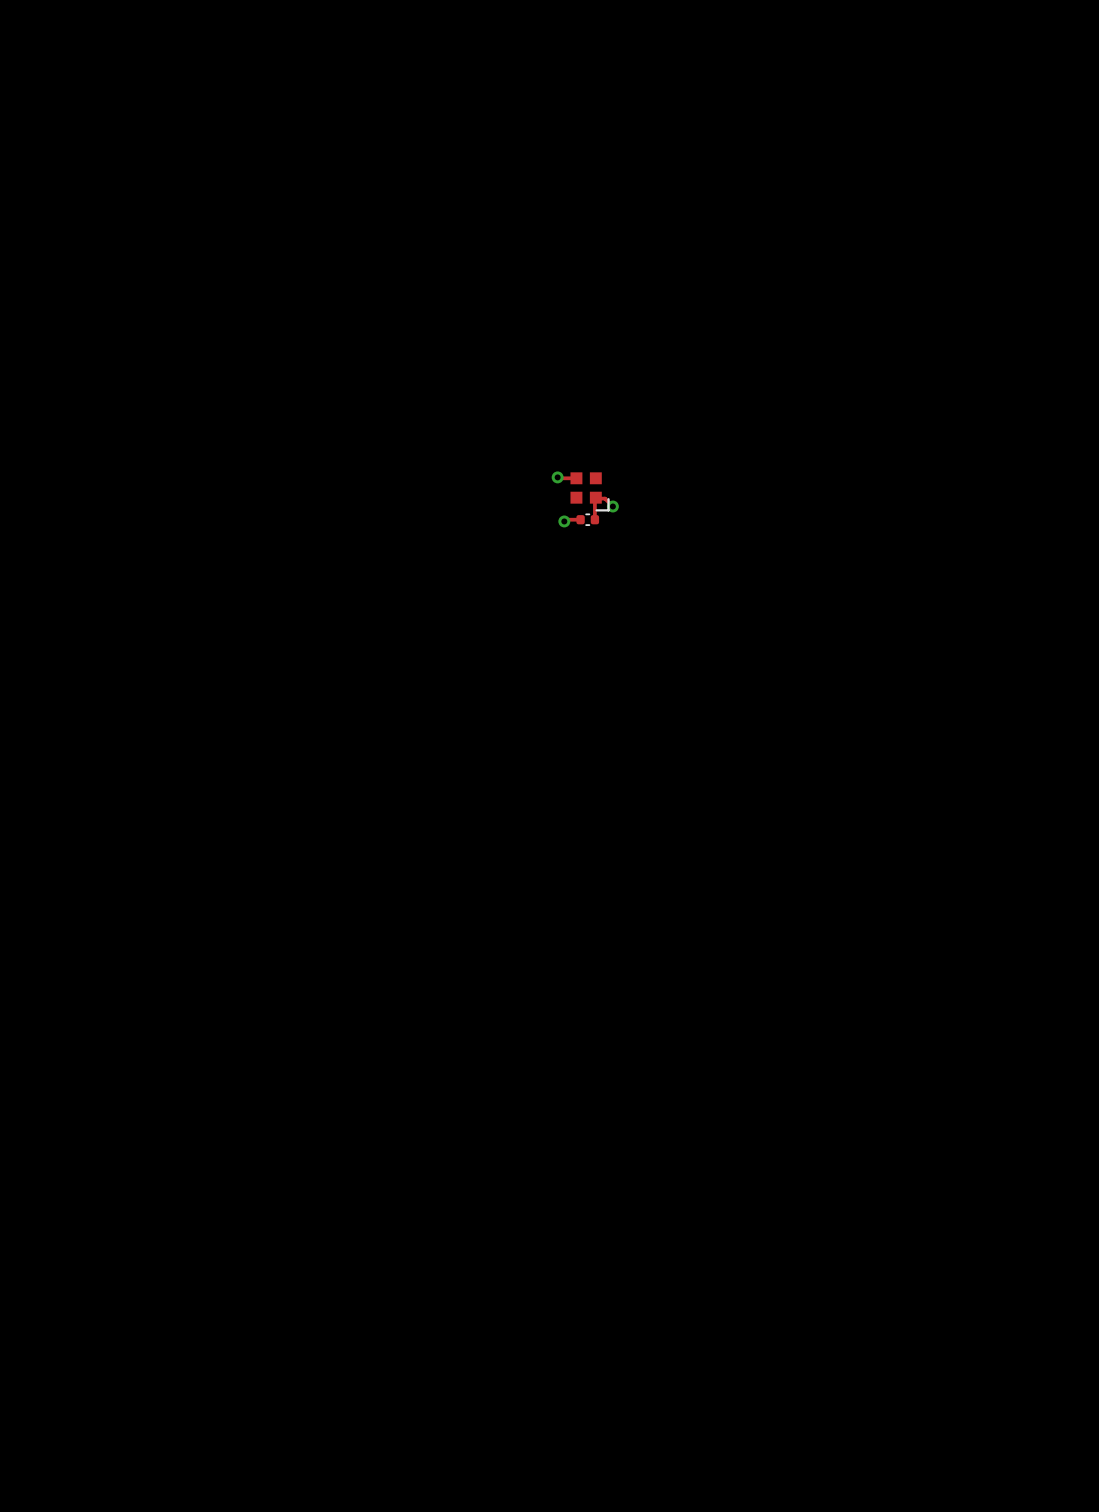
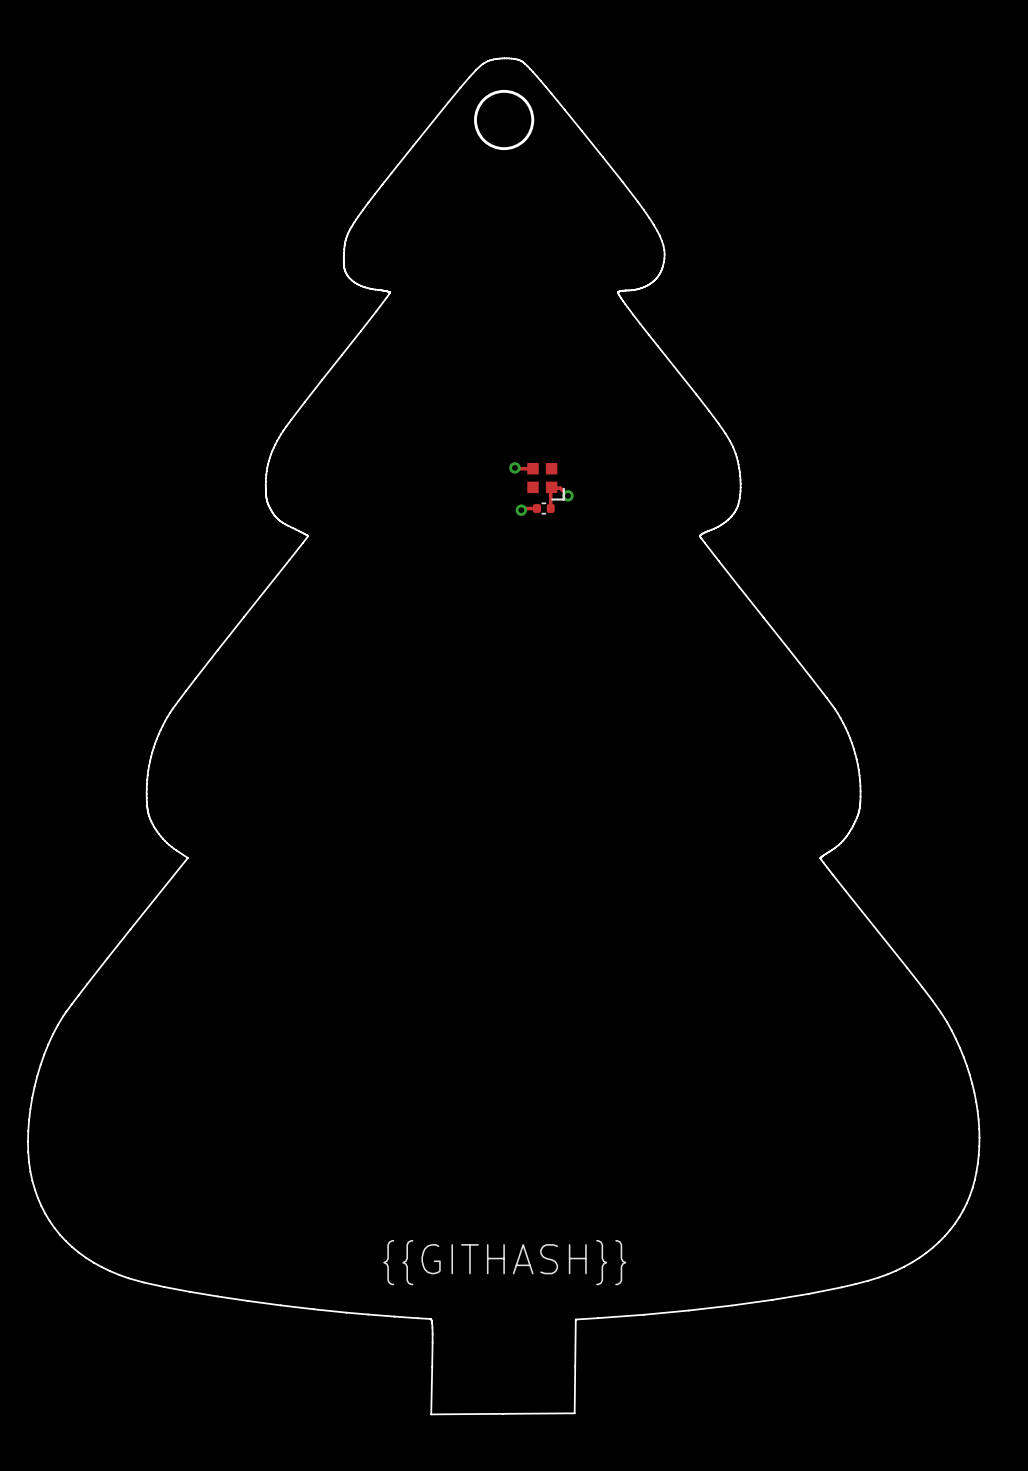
round board edge: none -> [474, 89, 535, 151]
board edge: none -> (389, 292) (360, 285) (347, 275) (344, 266) (343, 255) (345, 242) (349, 231) (374, 194) (469, 77) (484, 62) (504, 58) (521, 60) (536, 76) (622, 181) (649, 217) (659, 236) (663, 245) (664, 258) (657, 276) (643, 287) (617, 292)
board edge: none -> (390, 292) (286, 426) (269, 457) (265, 485) (269, 506) (280, 521) (308, 536)
board edge: none -> (617, 292) (718, 423) (735, 453) (740, 479) (737, 506) (726, 521) (700, 535)
board edge: none -> (308, 536) (186, 690) (162, 725) (149, 766) (146, 789) (147, 811) (152, 824) (160, 836) (171, 846) (187, 857) (63, 1016) (48, 1044) (37, 1075) (30, 1108) (27, 1141) (30, 1171) (34, 1189) (41, 1206) (54, 1228) (72, 1247) (93, 1262) (128, 1278) (189, 1291) (313, 1309) (430, 1319) (432, 1334) (431, 1414) (574, 1413) (575, 1319) (688, 1310) (772, 1299) (855, 1284) (878, 1277) (904, 1266) (926, 1252) (944, 1236) (959, 1216) (970, 1195) (976, 1171) (979, 1146) (978, 1119) (974, 1092) (960, 1048) (941, 1012) (820, 858)
board edge: none -> (699, 536) (826, 697) (840, 718) (850, 738) (859, 775) (858, 811) (852, 826) (844, 839) (820, 857)
text: none -> {{GITHASH}} (504, 1262)

